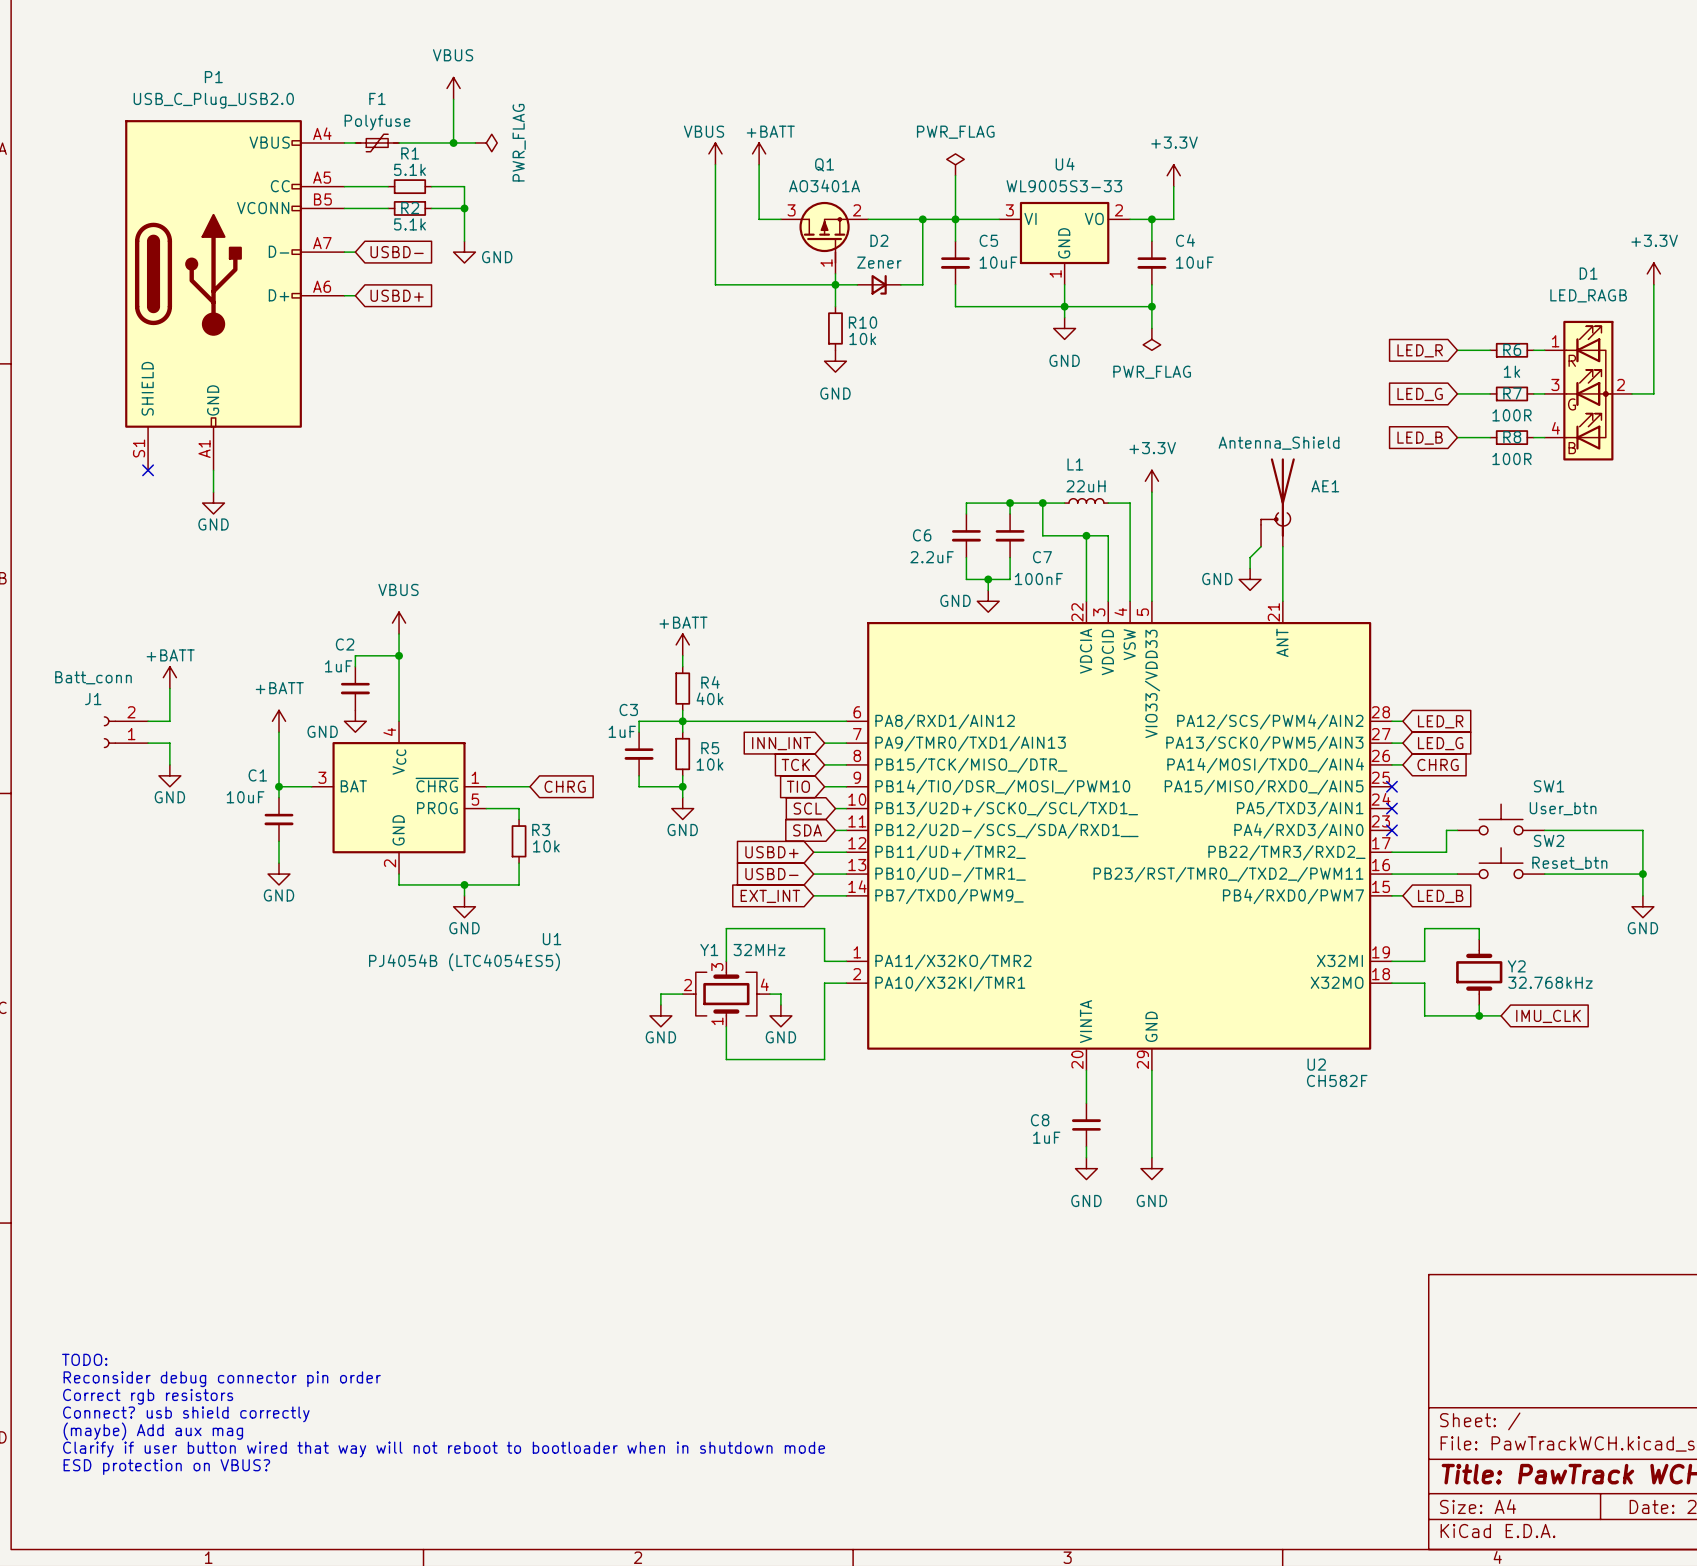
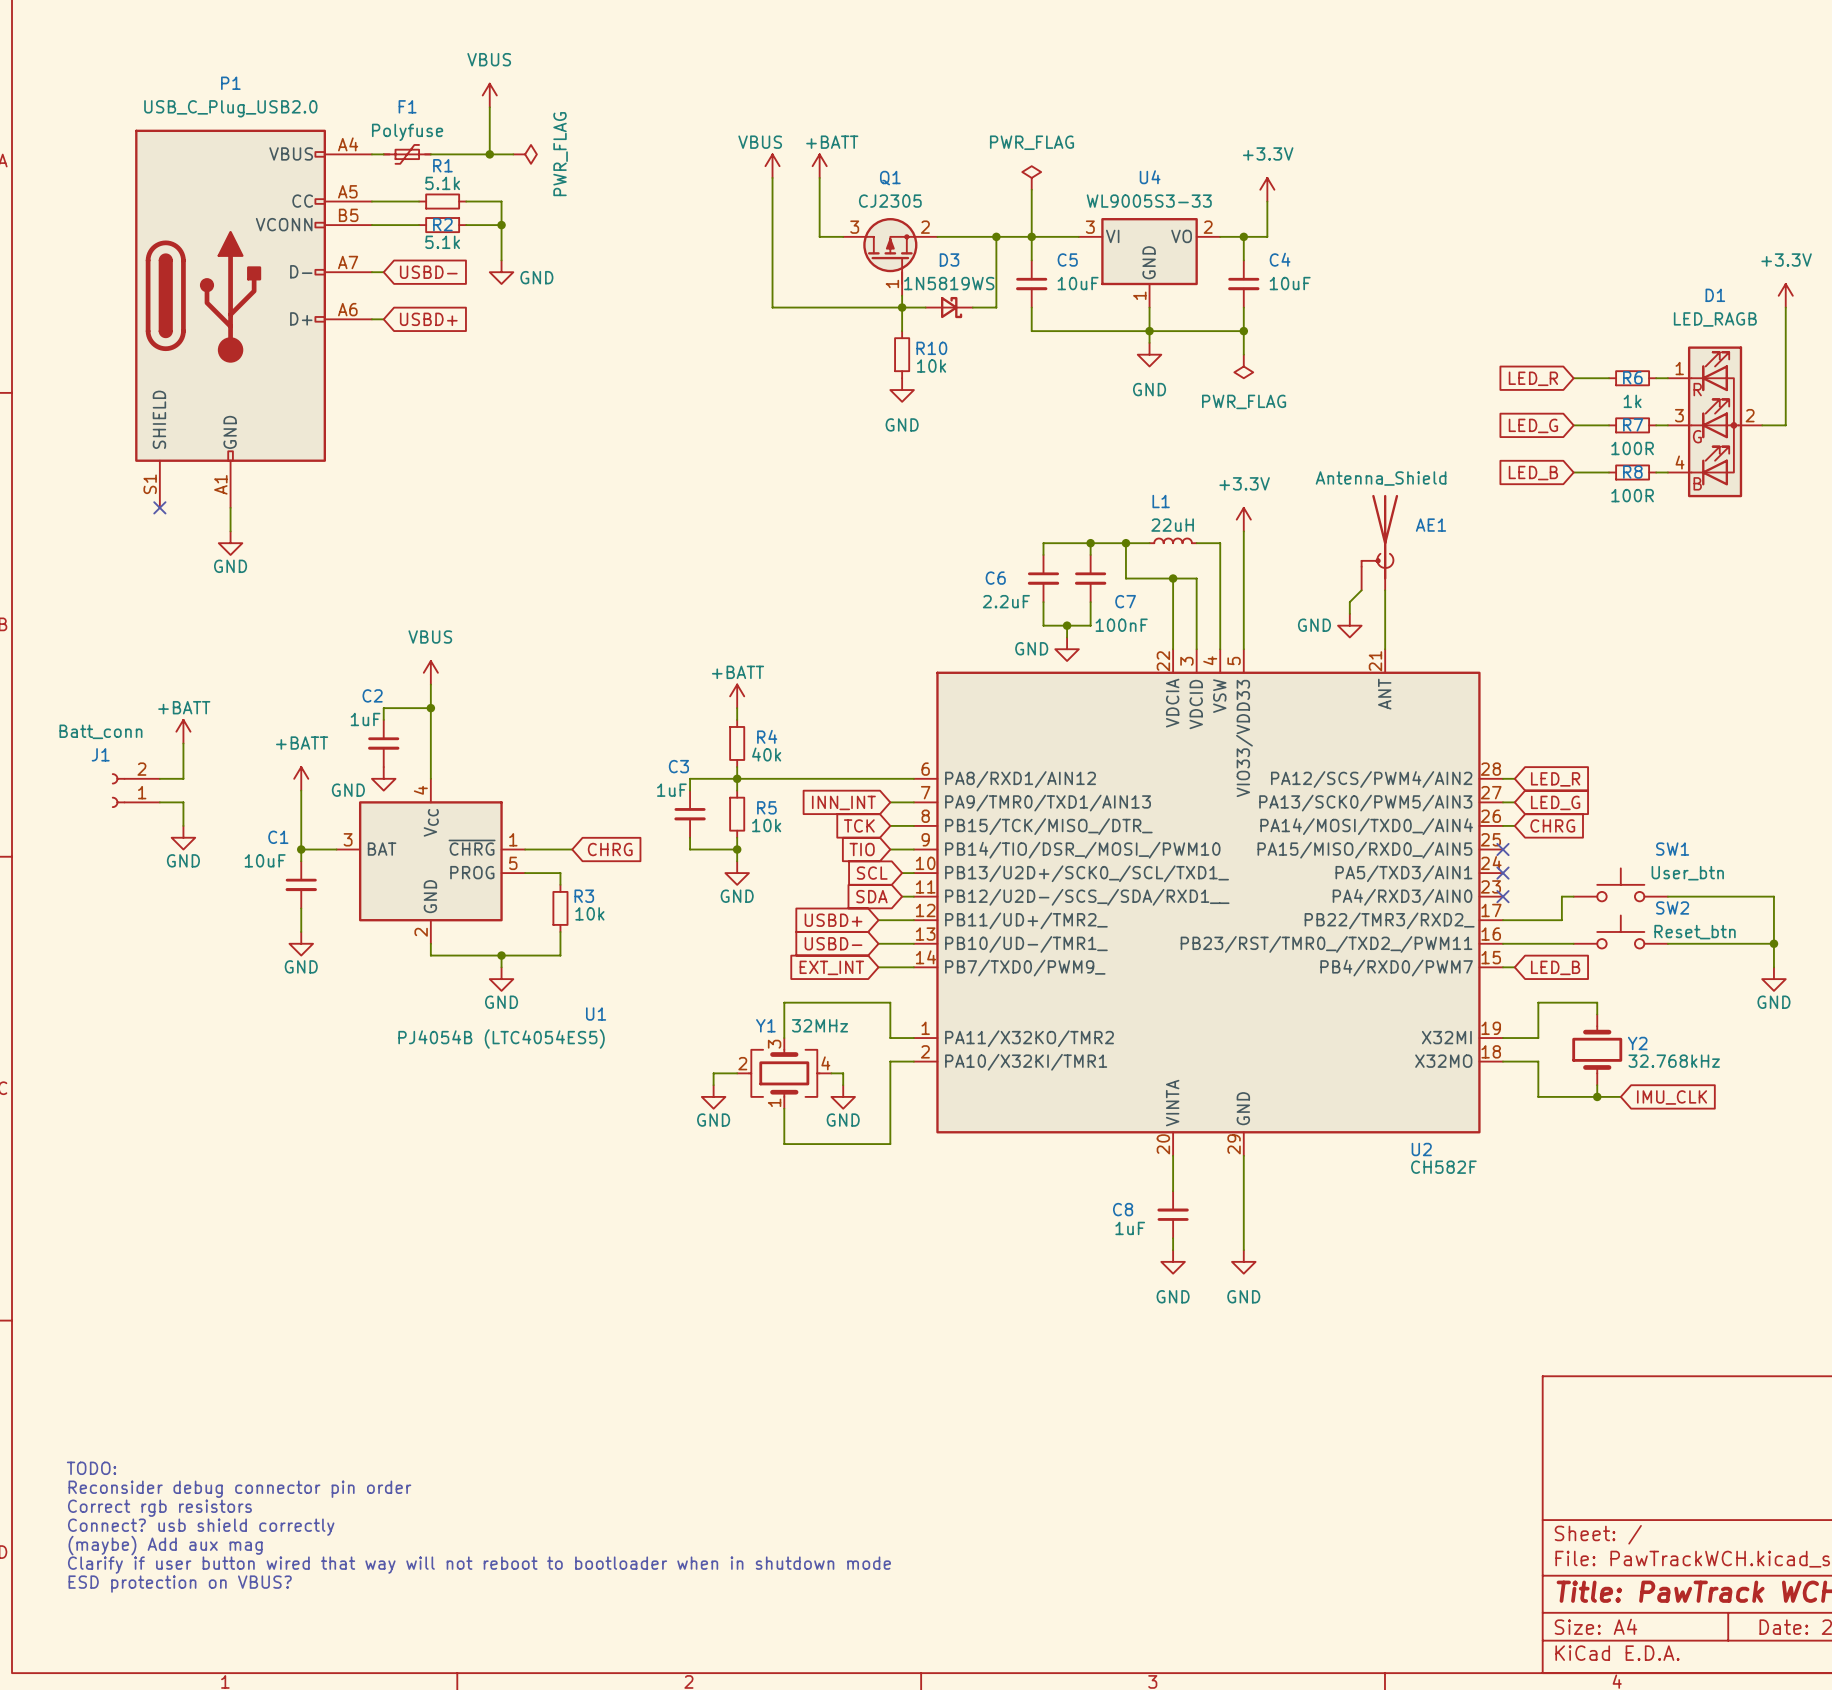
Q1 value: AO3401A (824, 185) -> CJ2305 (890, 201)
D2: Zener (879, 284) -> none
D3: none -> 1N5819WS (949, 307)

